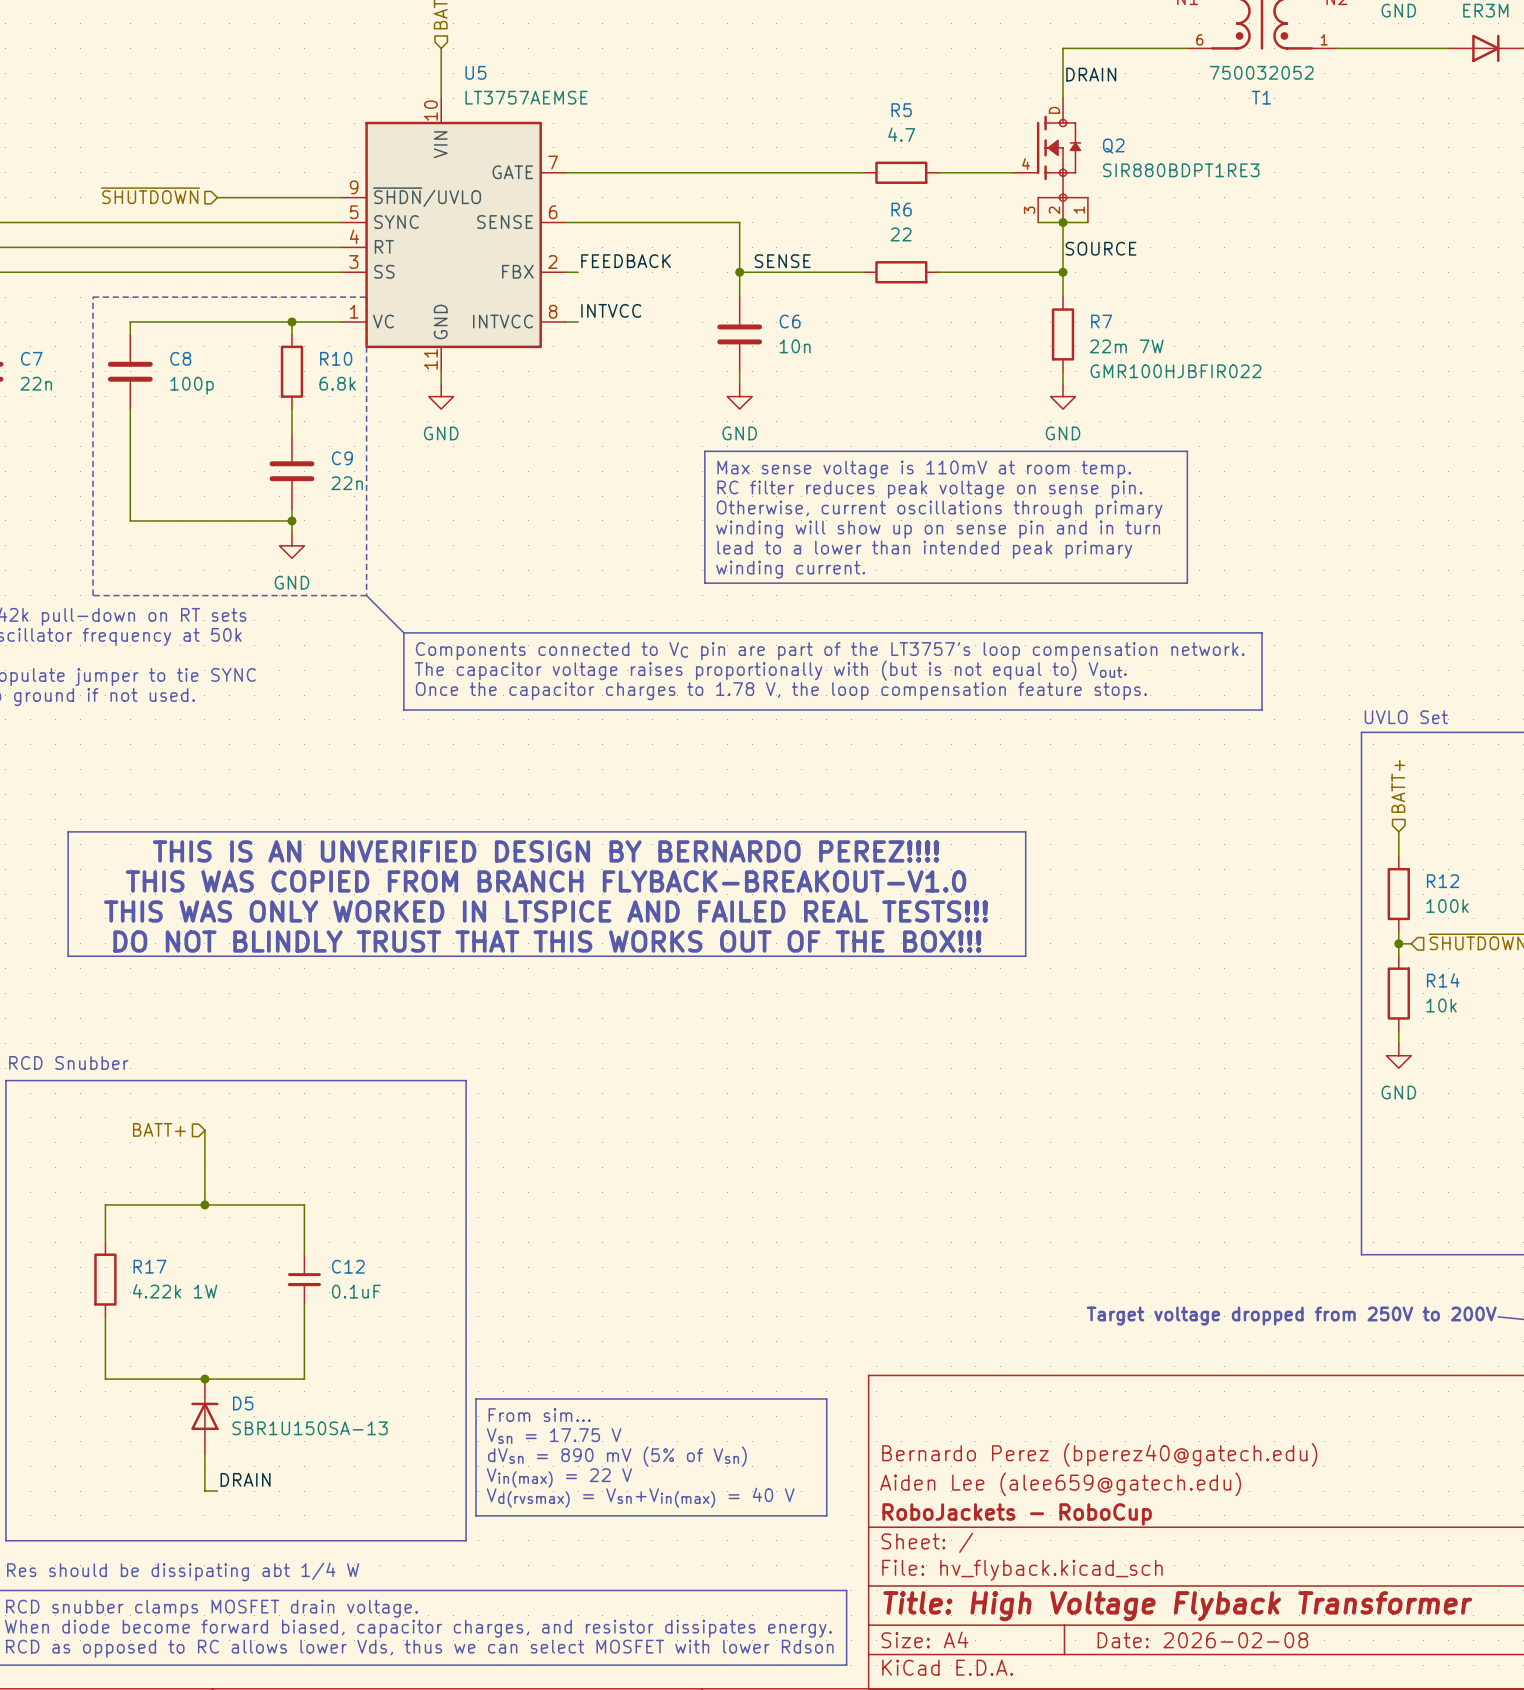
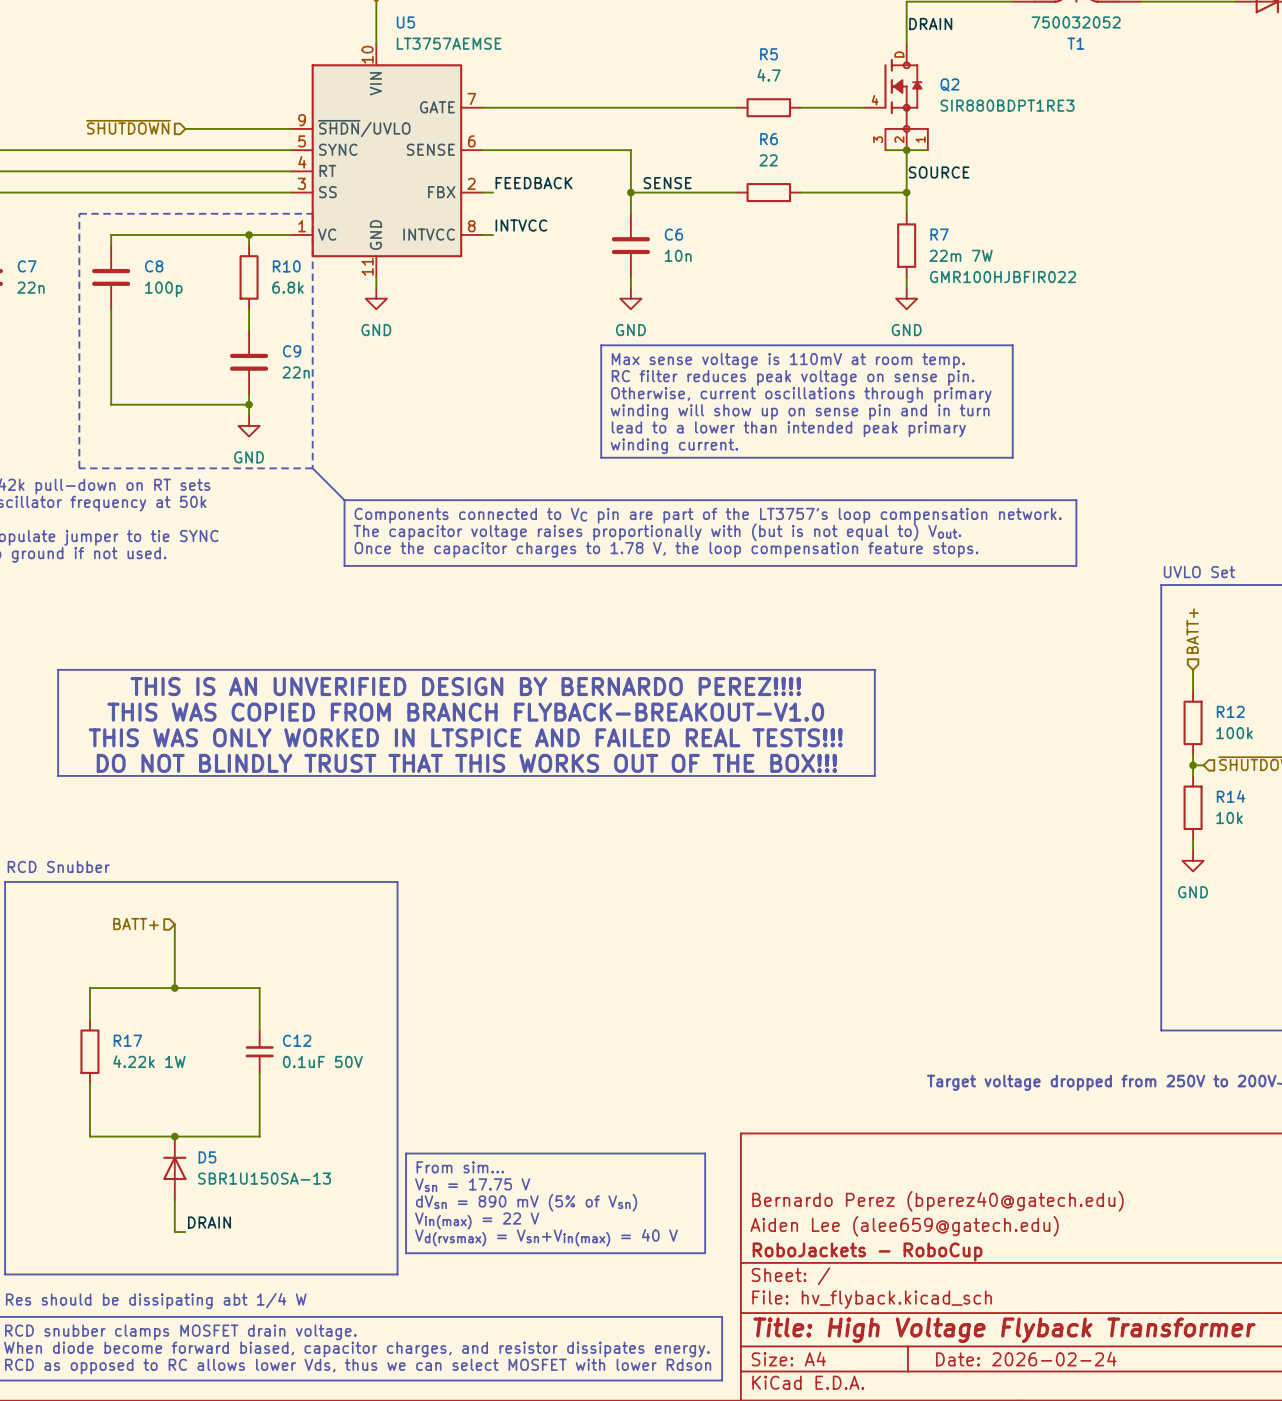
C12 value: 0.1uF (356, 1291) -> 0.1uF 50V (322, 1061)
title block: Date: 2026-02-08 (1202, 1640) -> Date: 2026-02-24 (1026, 1359)

